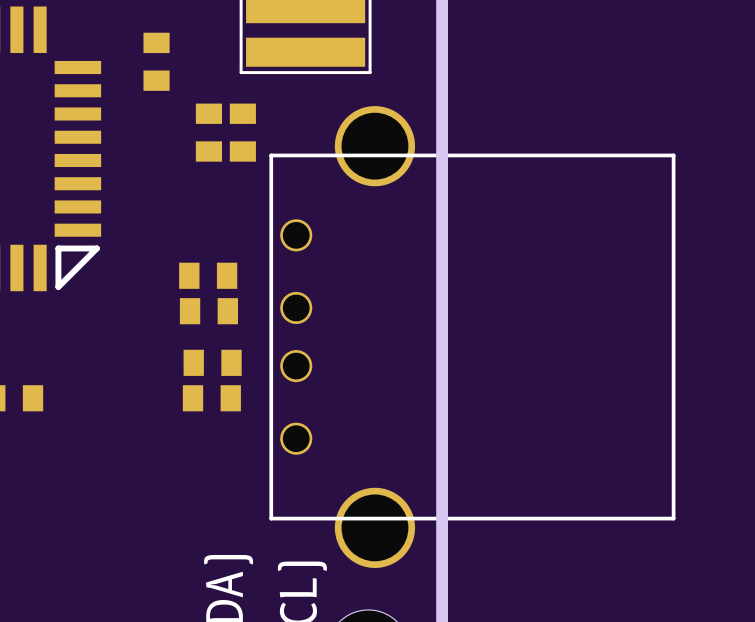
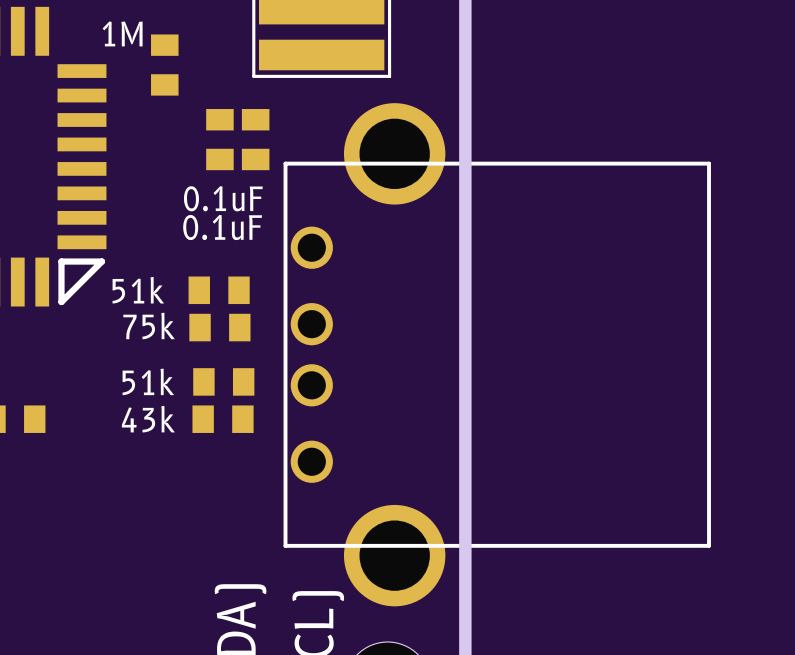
part value: none -> 1M (122, 33)
part footprint: [269, 106, 676, 568] -> [283, 103, 711, 607]
part value: none -> 0.1uF (223, 198)
part value: none -> 0.1uF (222, 227)
part value: none -> 51k (138, 290)
part value: none -> 75k (149, 325)
part value: none -> 51k (148, 381)
part value: none -> 43k (148, 419)

